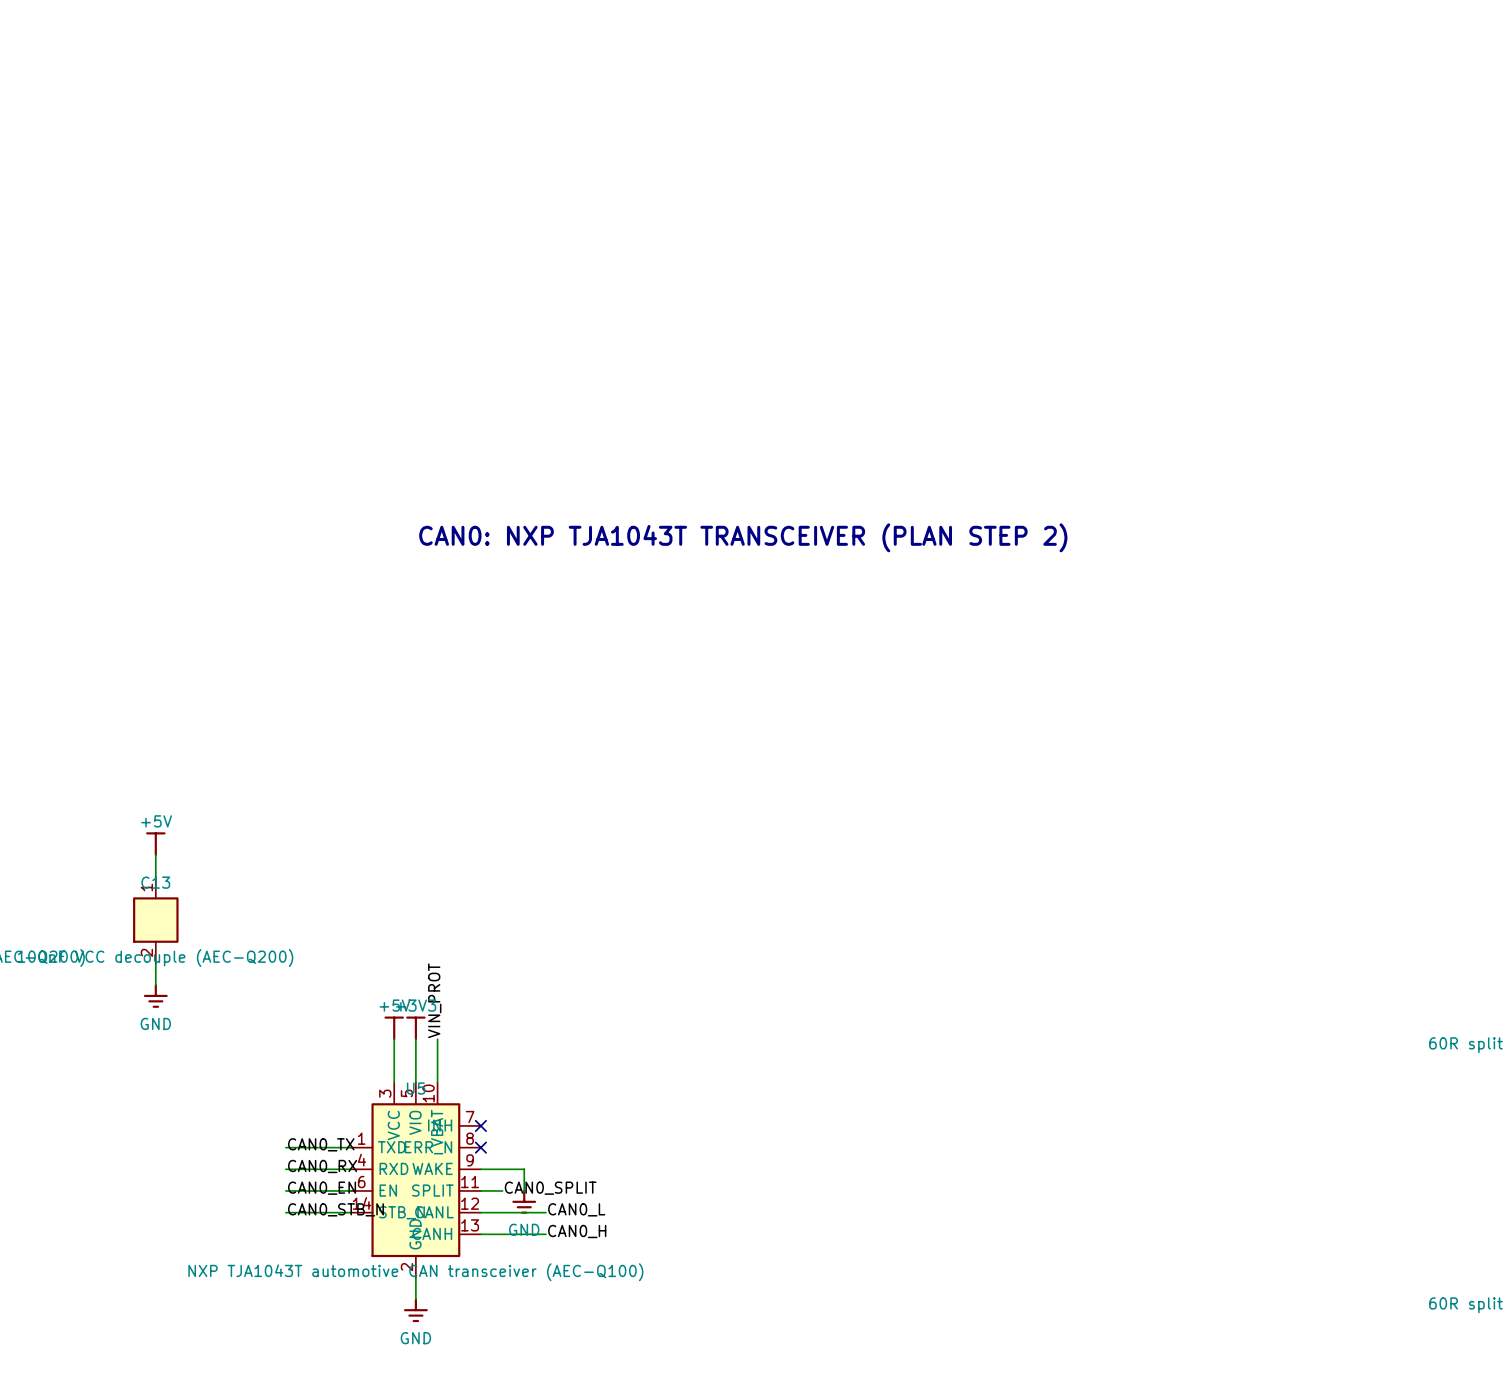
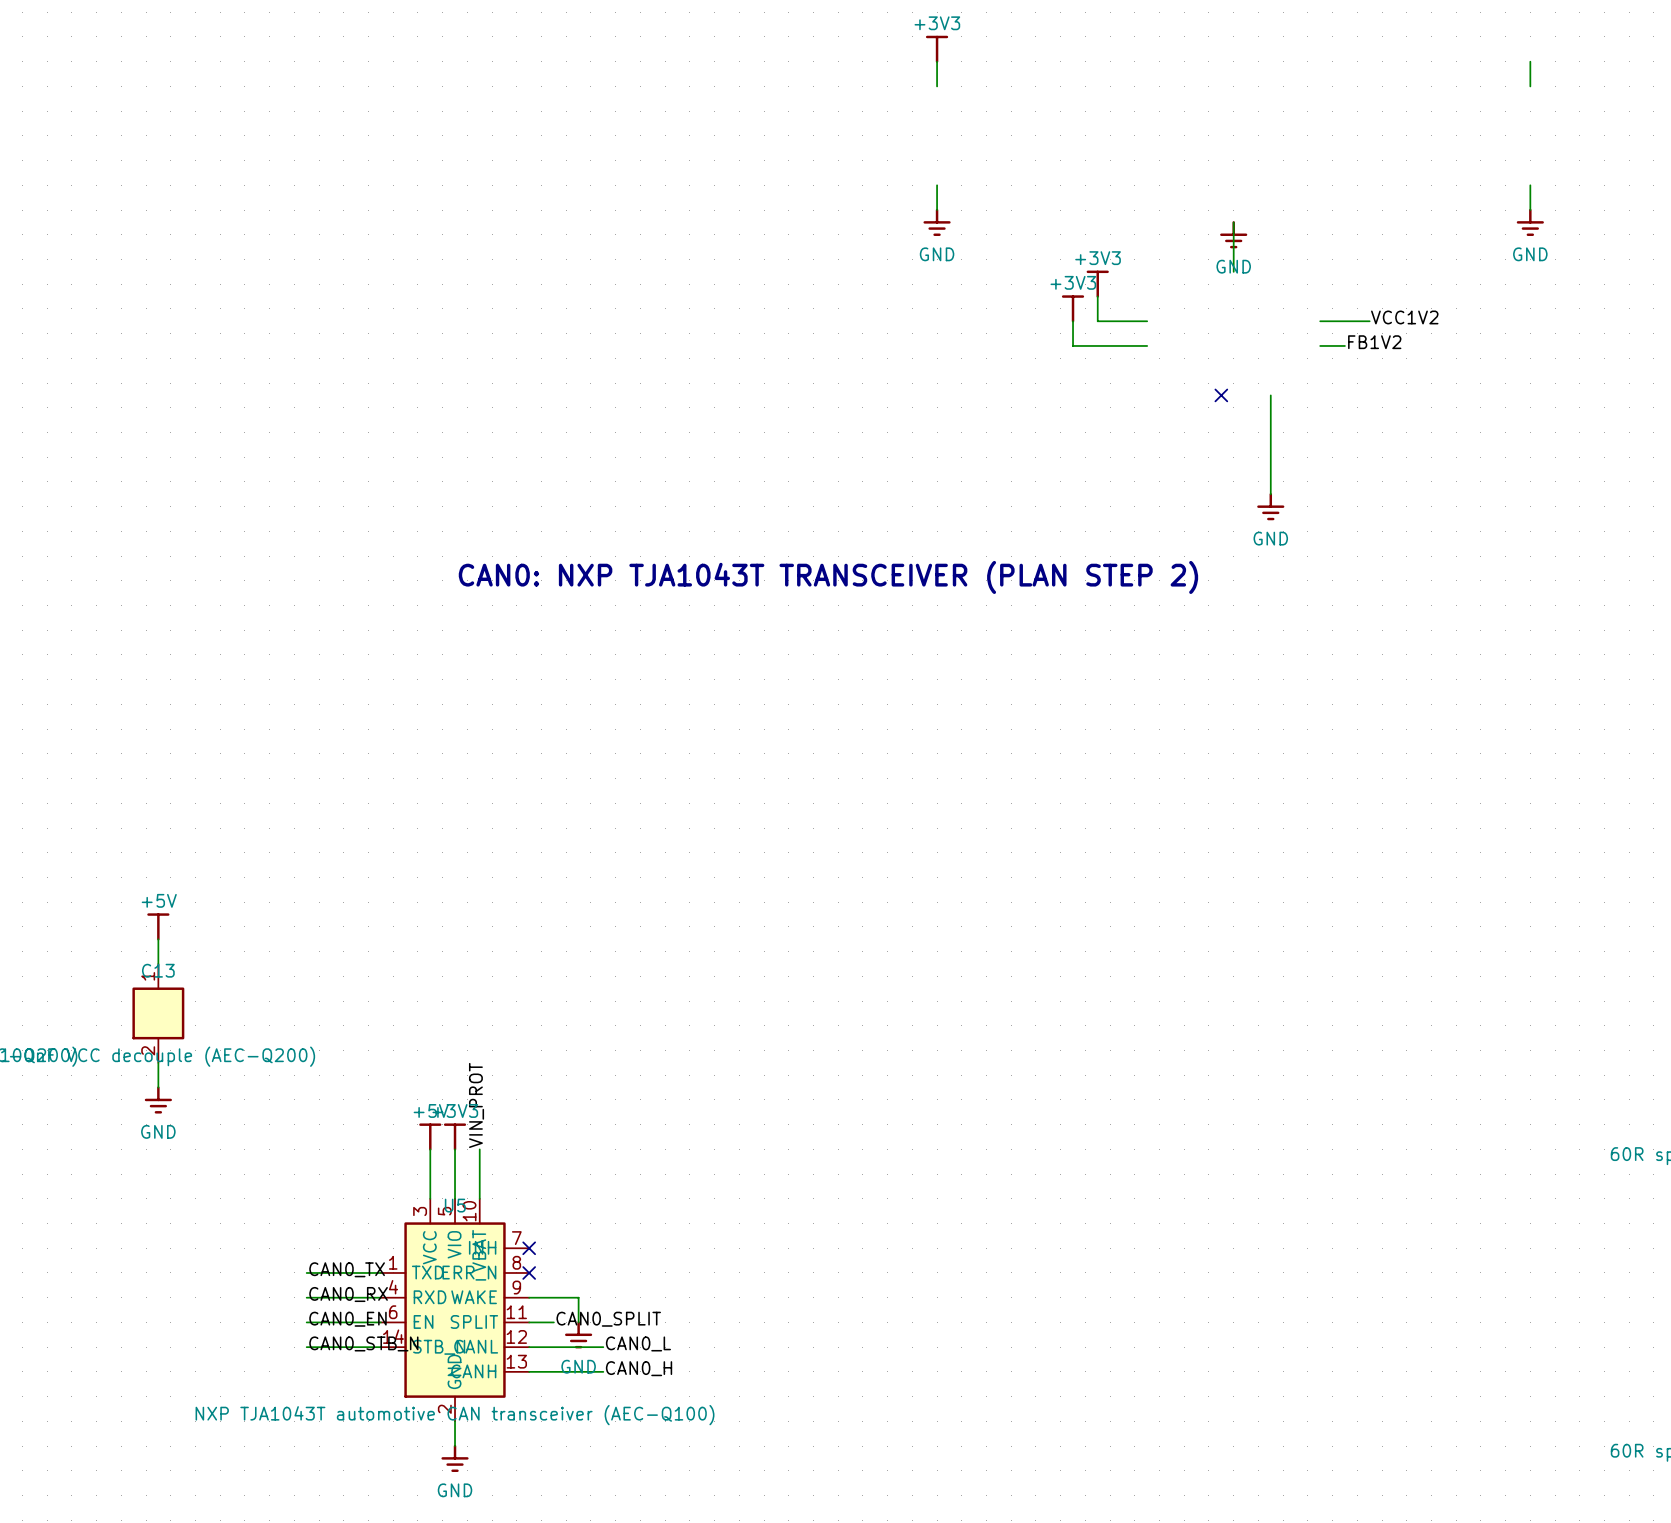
power symbol: none -> +3V3 (937, 49)
wire: none -> (937, 61) (937, 86)
wire: none -> (1530, 61) (1530, 86)
wire: none -> (937, 185) (937, 210)
wire: none -> (1530, 185) (1530, 210)
power symbol: none -> GND (937, 222)
wire: none -> (1233, 222) (1233, 271)
power symbol: none -> GND (1530, 222)
power symbol: none -> GND (1233, 234)
power symbol: none -> +3V3 (1097, 284)
wire: none -> (1097, 296) (1097, 321) (1147, 321)
power symbol: none -> +3V3 (1073, 308)
label: none -> VCC1V2 (1404, 317)
wire: none -> (1073, 321) (1073, 345) (1147, 345)
wire: none -> (1320, 321) (1369, 321)
label: none -> FB1V2 (1374, 342)
wire: none -> (1320, 345) (1344, 345)
no-connect mark: none -> (1221, 395)
wire: none -> (1270, 395) (1270, 494)
power symbol: none -> GND (1270, 506)

